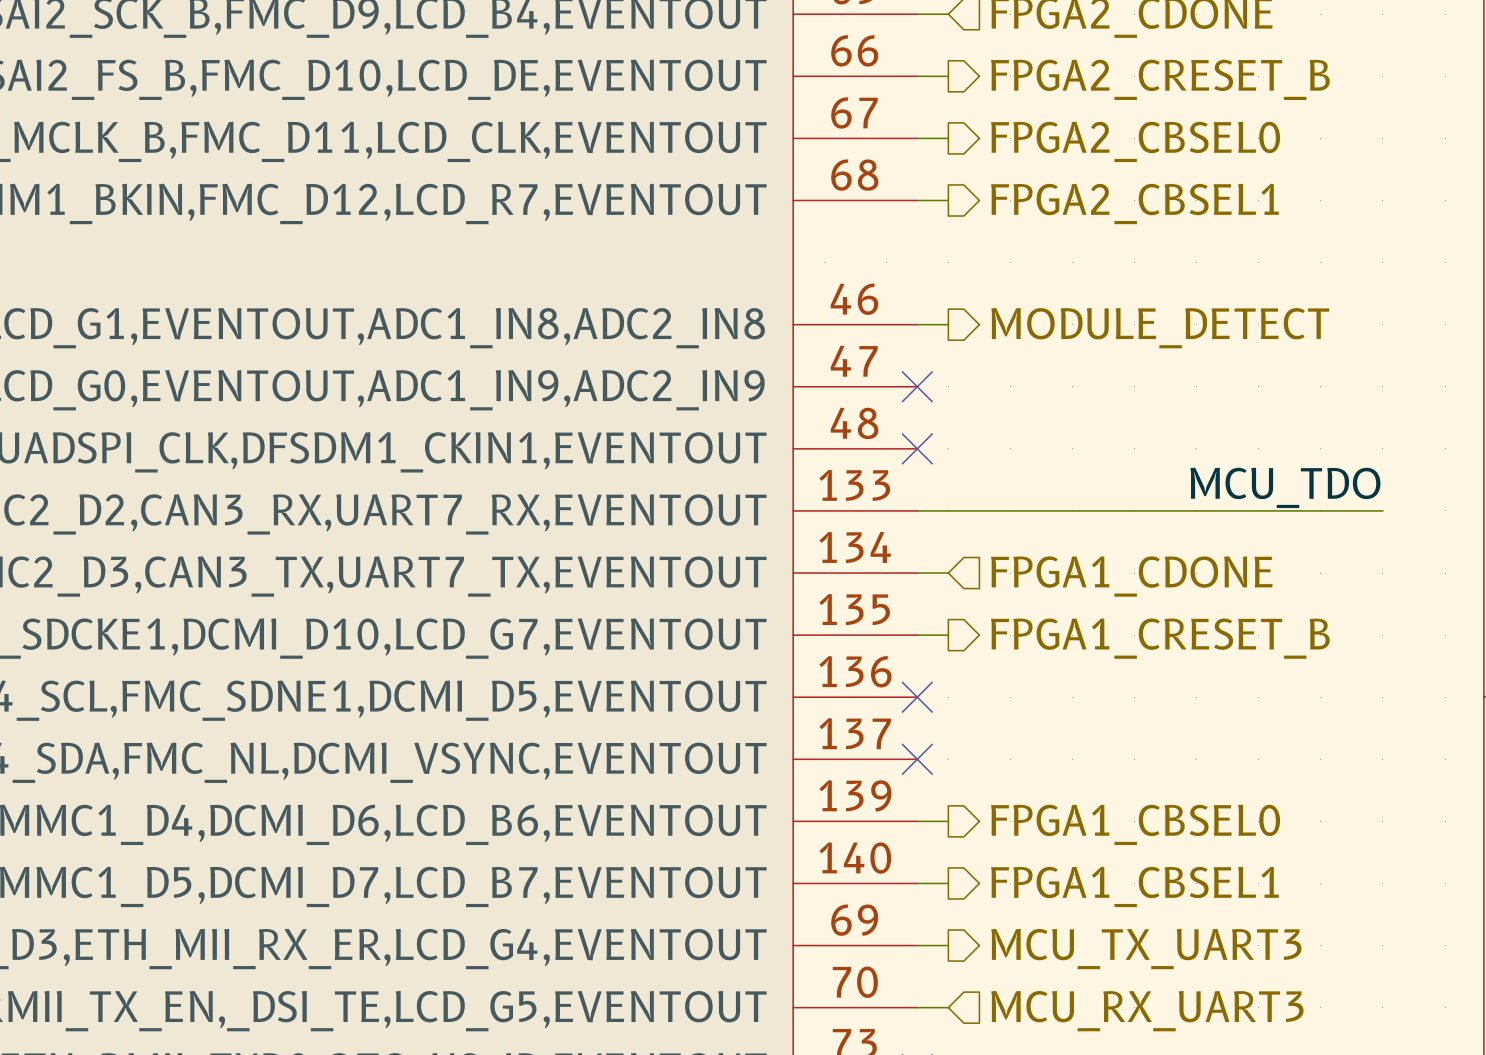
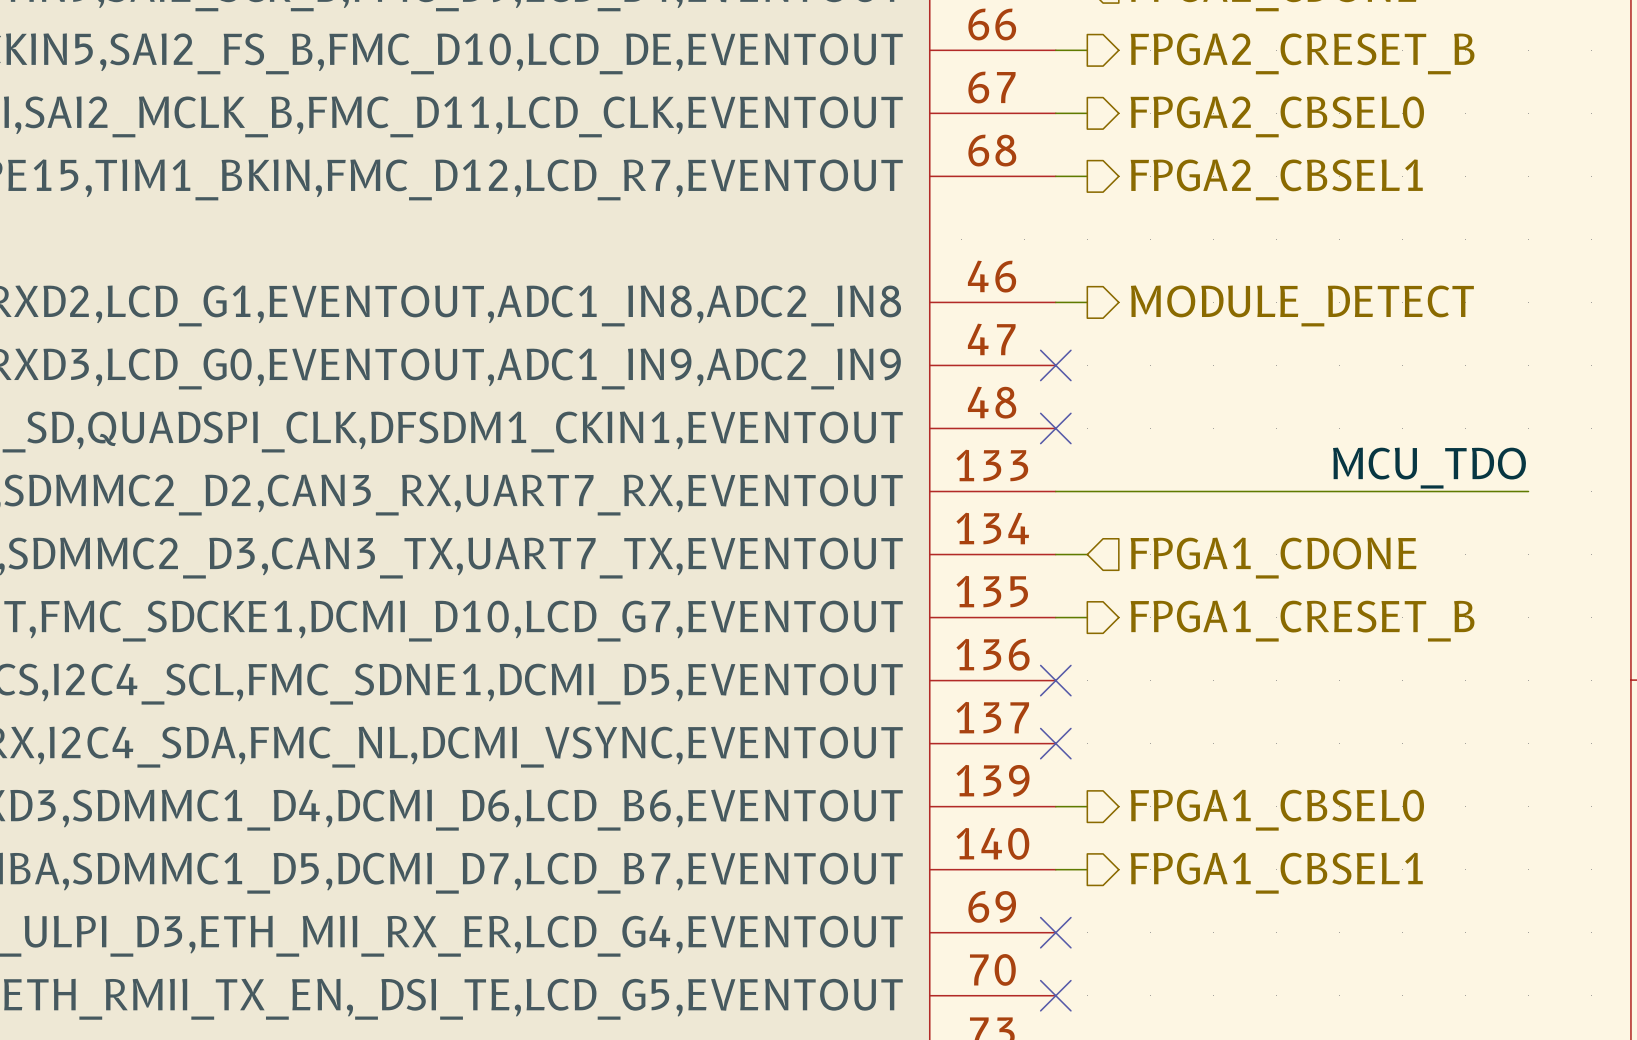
wire: (917, 945) (948, 945) -> none
no-connect mark: none -> (1055, 932)
hierarchical label: MCU_TX_UART3 (1146, 949) -> none
wire: (917, 1007) (948, 1007) -> none
no-connect mark: none -> (1055, 995)
hierarchical label: MCU_RX_UART3 (1147, 1011) -> none

